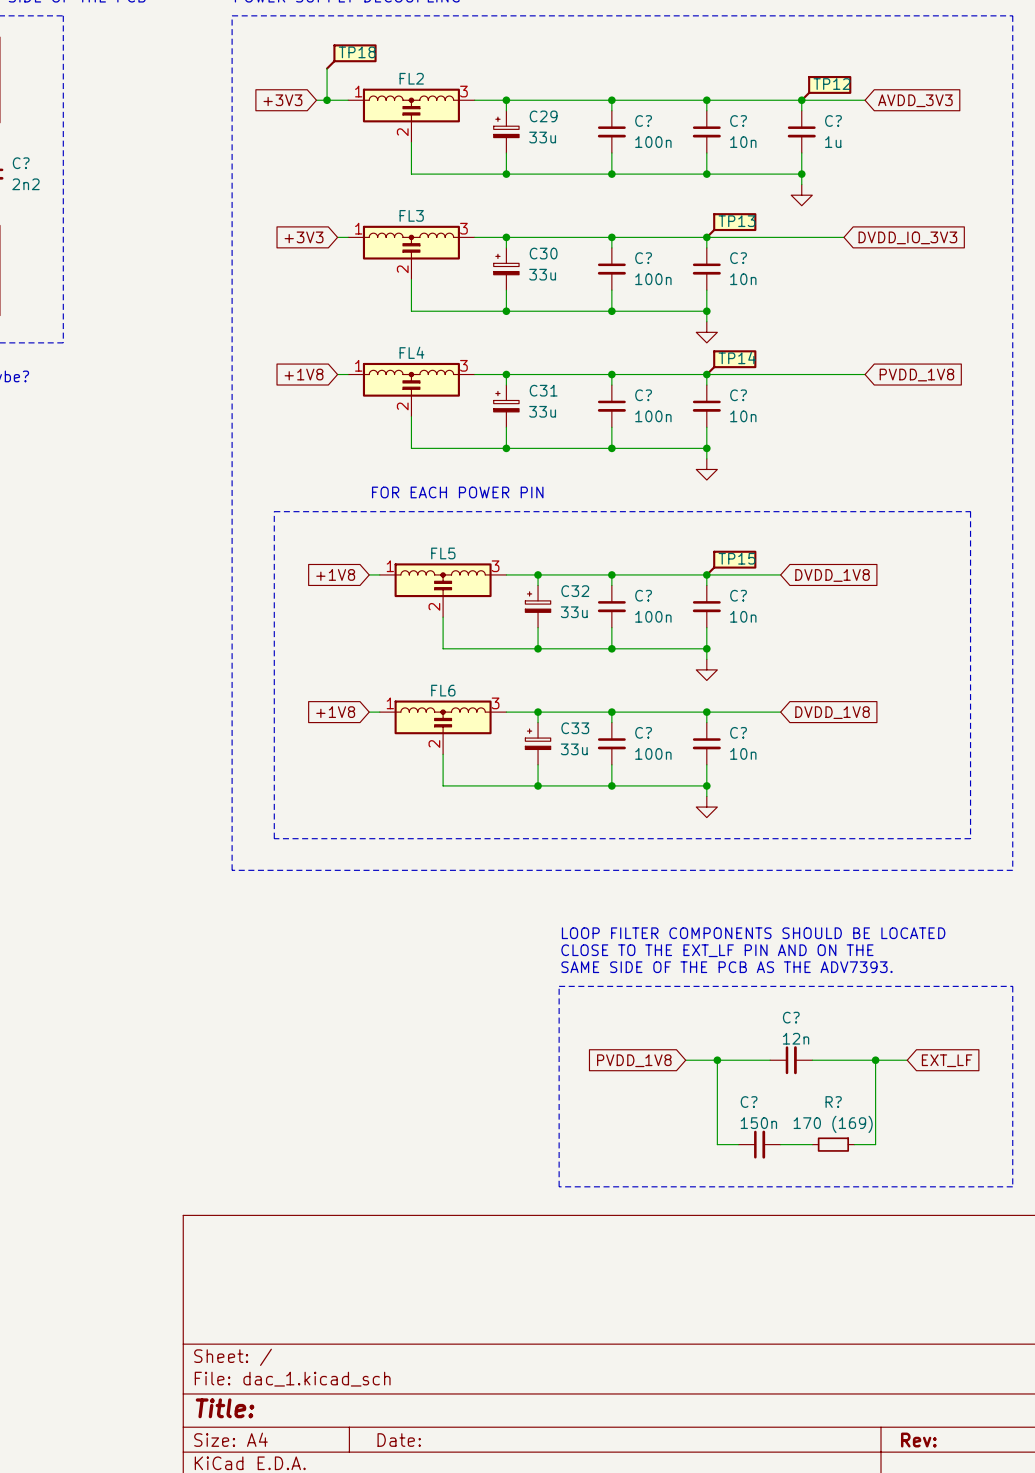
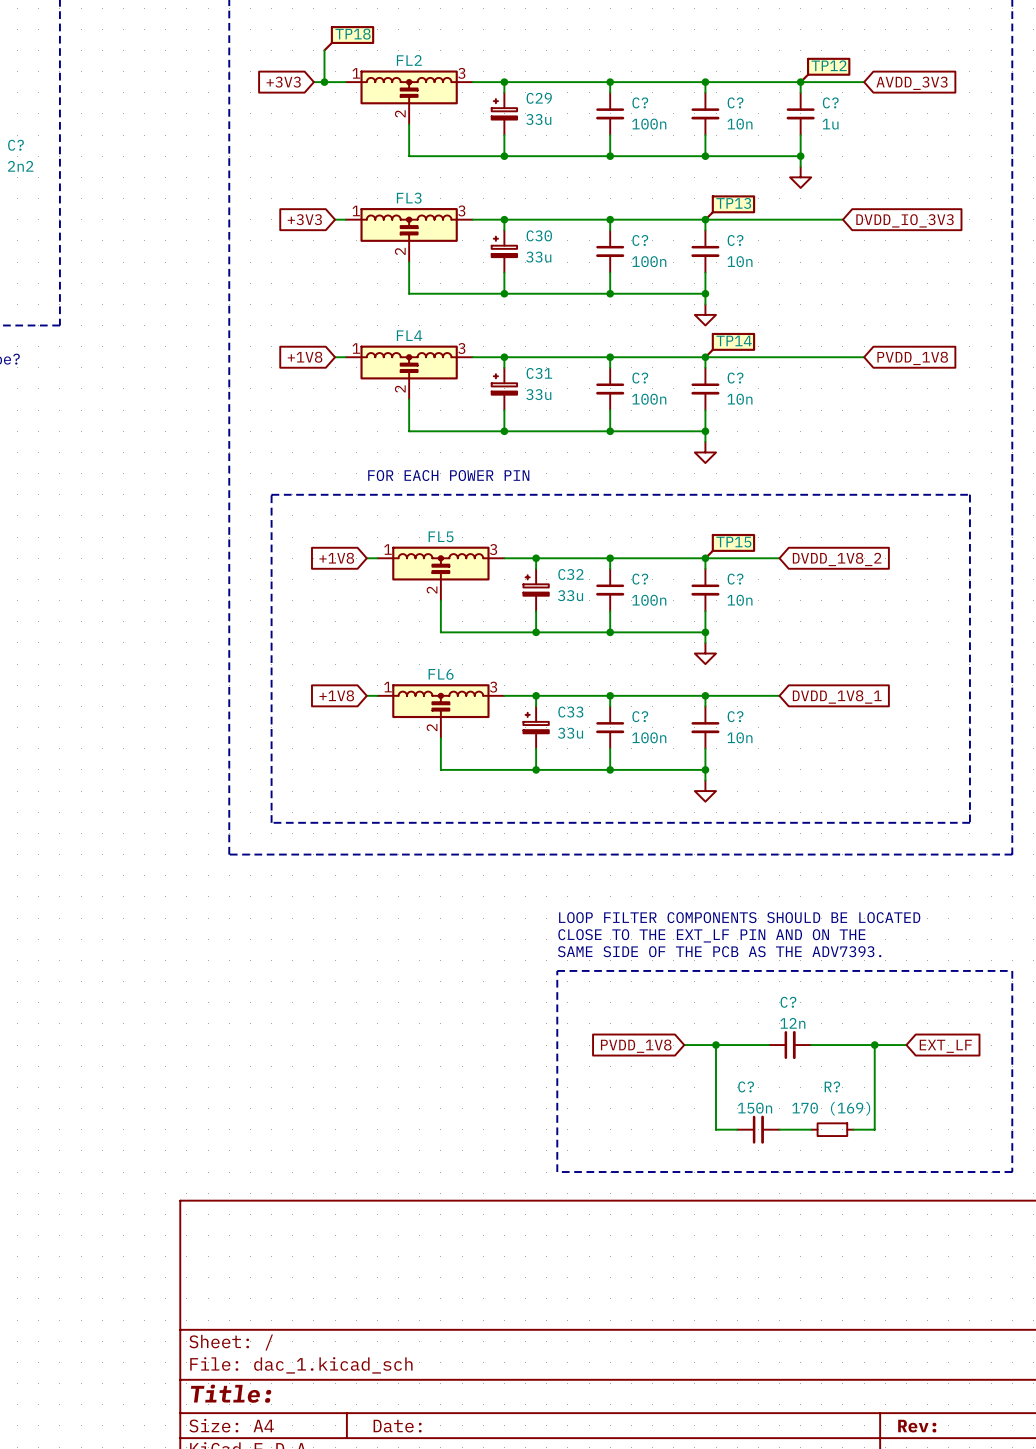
global label: DVDD_1V8 (832, 575) -> DVDD_1V8_2 (837, 559)
global label: DVDD_1V8 (832, 712) -> DVDD_1V8_1 (837, 697)

